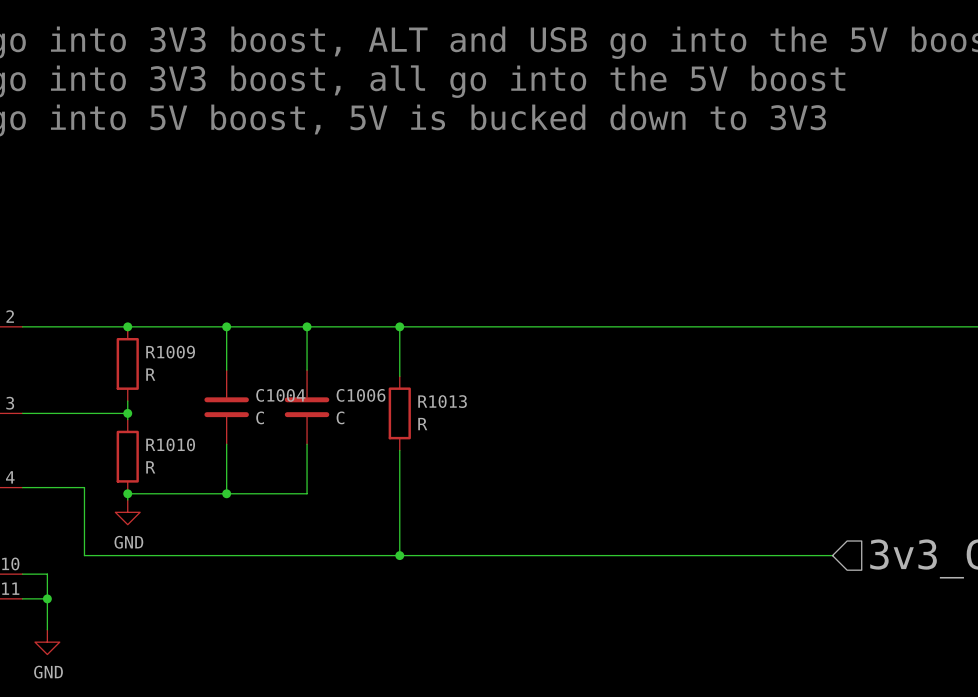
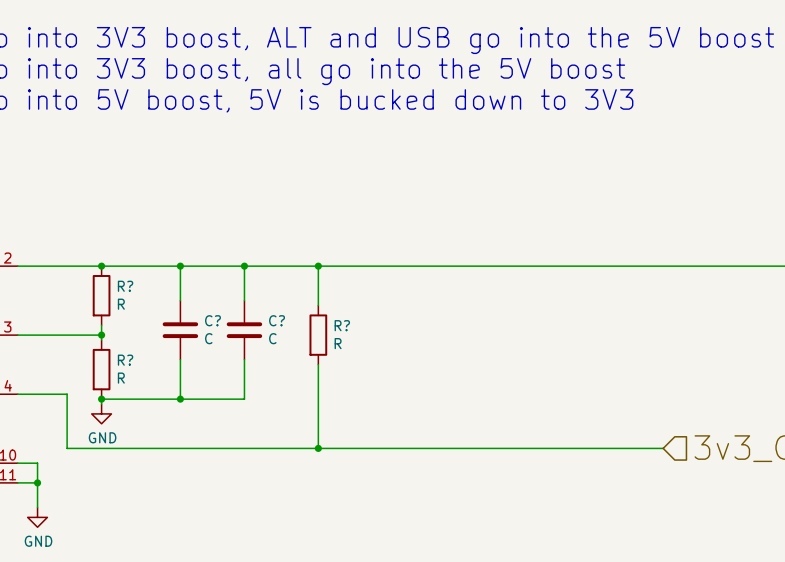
R1009 name: R1009 (170, 352) -> R? (125, 286)
C1004 name: C1004 (280, 395) -> C? (213, 320)
C1006 name: C1006 (361, 395) -> C? (277, 320)
R1013 name: R1013 (442, 401) -> R? (342, 325)
R1010 name: R1010 (170, 444) -> R? (125, 360)

